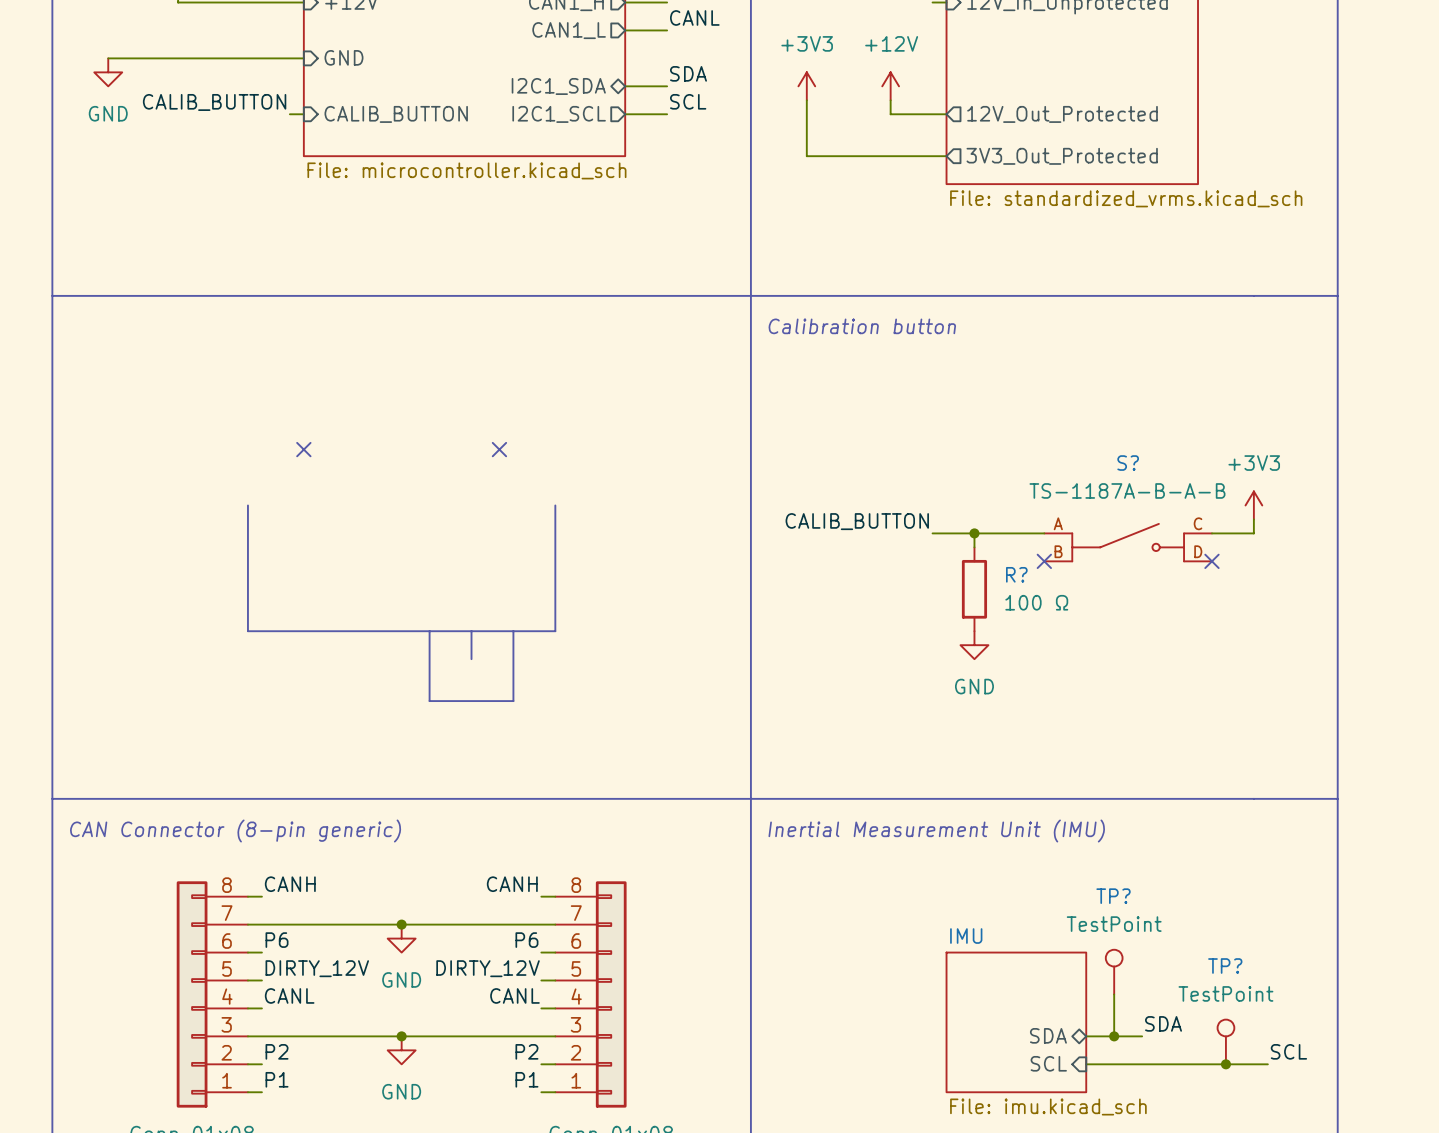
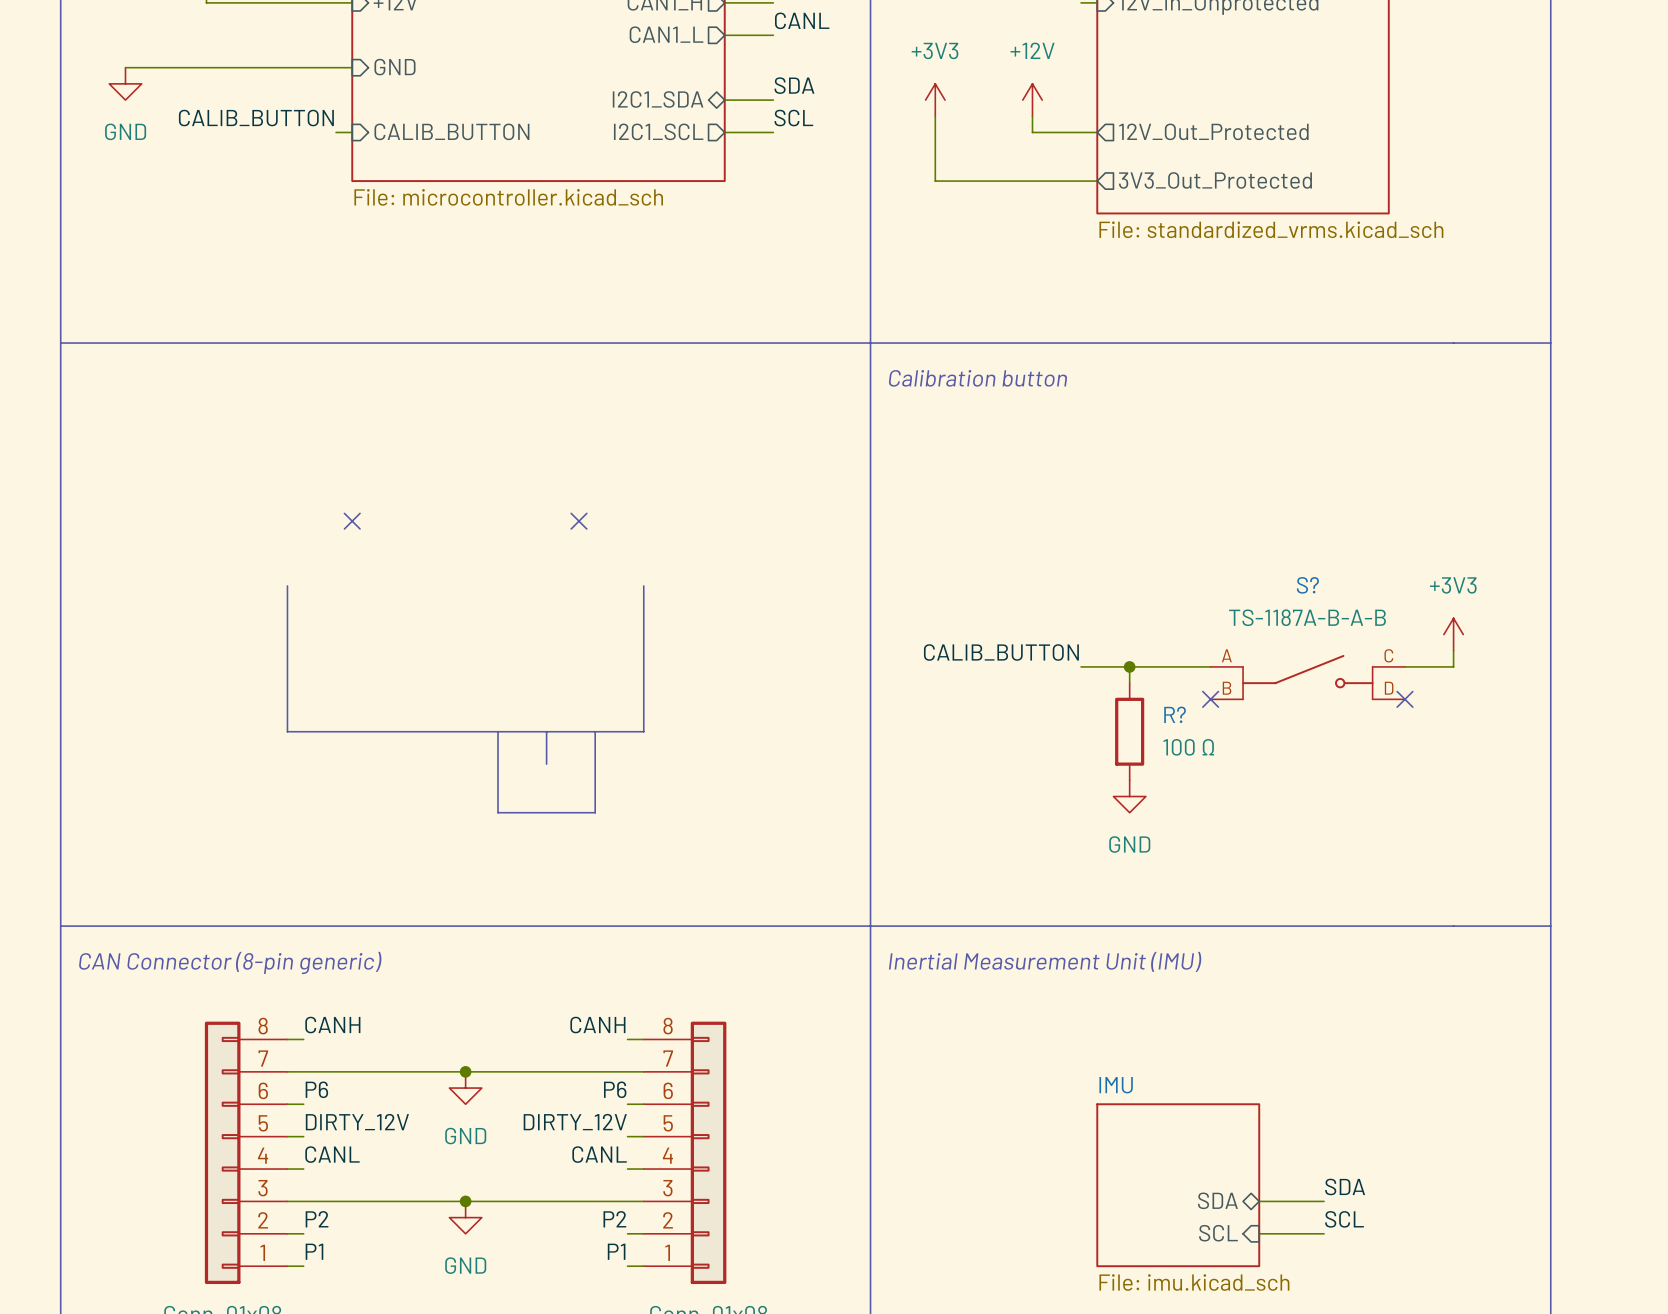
power symbol position: +3V3 (1253, 505) -> +3V3 (1453, 634)
wire: (1253, 519) (1253, 533) (1211, 533) -> (1453, 650) (1453, 666) (1404, 666)
label position: CALIB_BUTTON (857, 521) -> CALIB_BUTTON (1001, 652)
wire: (932, 533) (1044, 533) -> (1081, 666) (1210, 666)
wire: (974, 533) (974, 547) -> (1129, 666) (1129, 683)
junction position: (974, 533) -> (1129, 666)
S? position: (1128, 542) -> (1307, 677)
no-connect mark position: (1044, 561) -> (1210, 699)
no-connect mark position: (1211, 561) -> (1404, 699)
R? position: (974, 589) -> (1129, 731)
power symbol position: GND (974, 645) -> GND (1129, 796)
TP?: TestPoint (1114, 972) -> none
wire: (1114, 994) (1114, 1036) -> none
junction: (1114, 1036) -> none
TP?: TestPoint (1225, 1041) -> none
label position: SCL (1288, 1051) -> SCL (1344, 1219)
wire: (1142, 1064) (1267, 1064) -> none
junction: (1225, 1064) -> none

